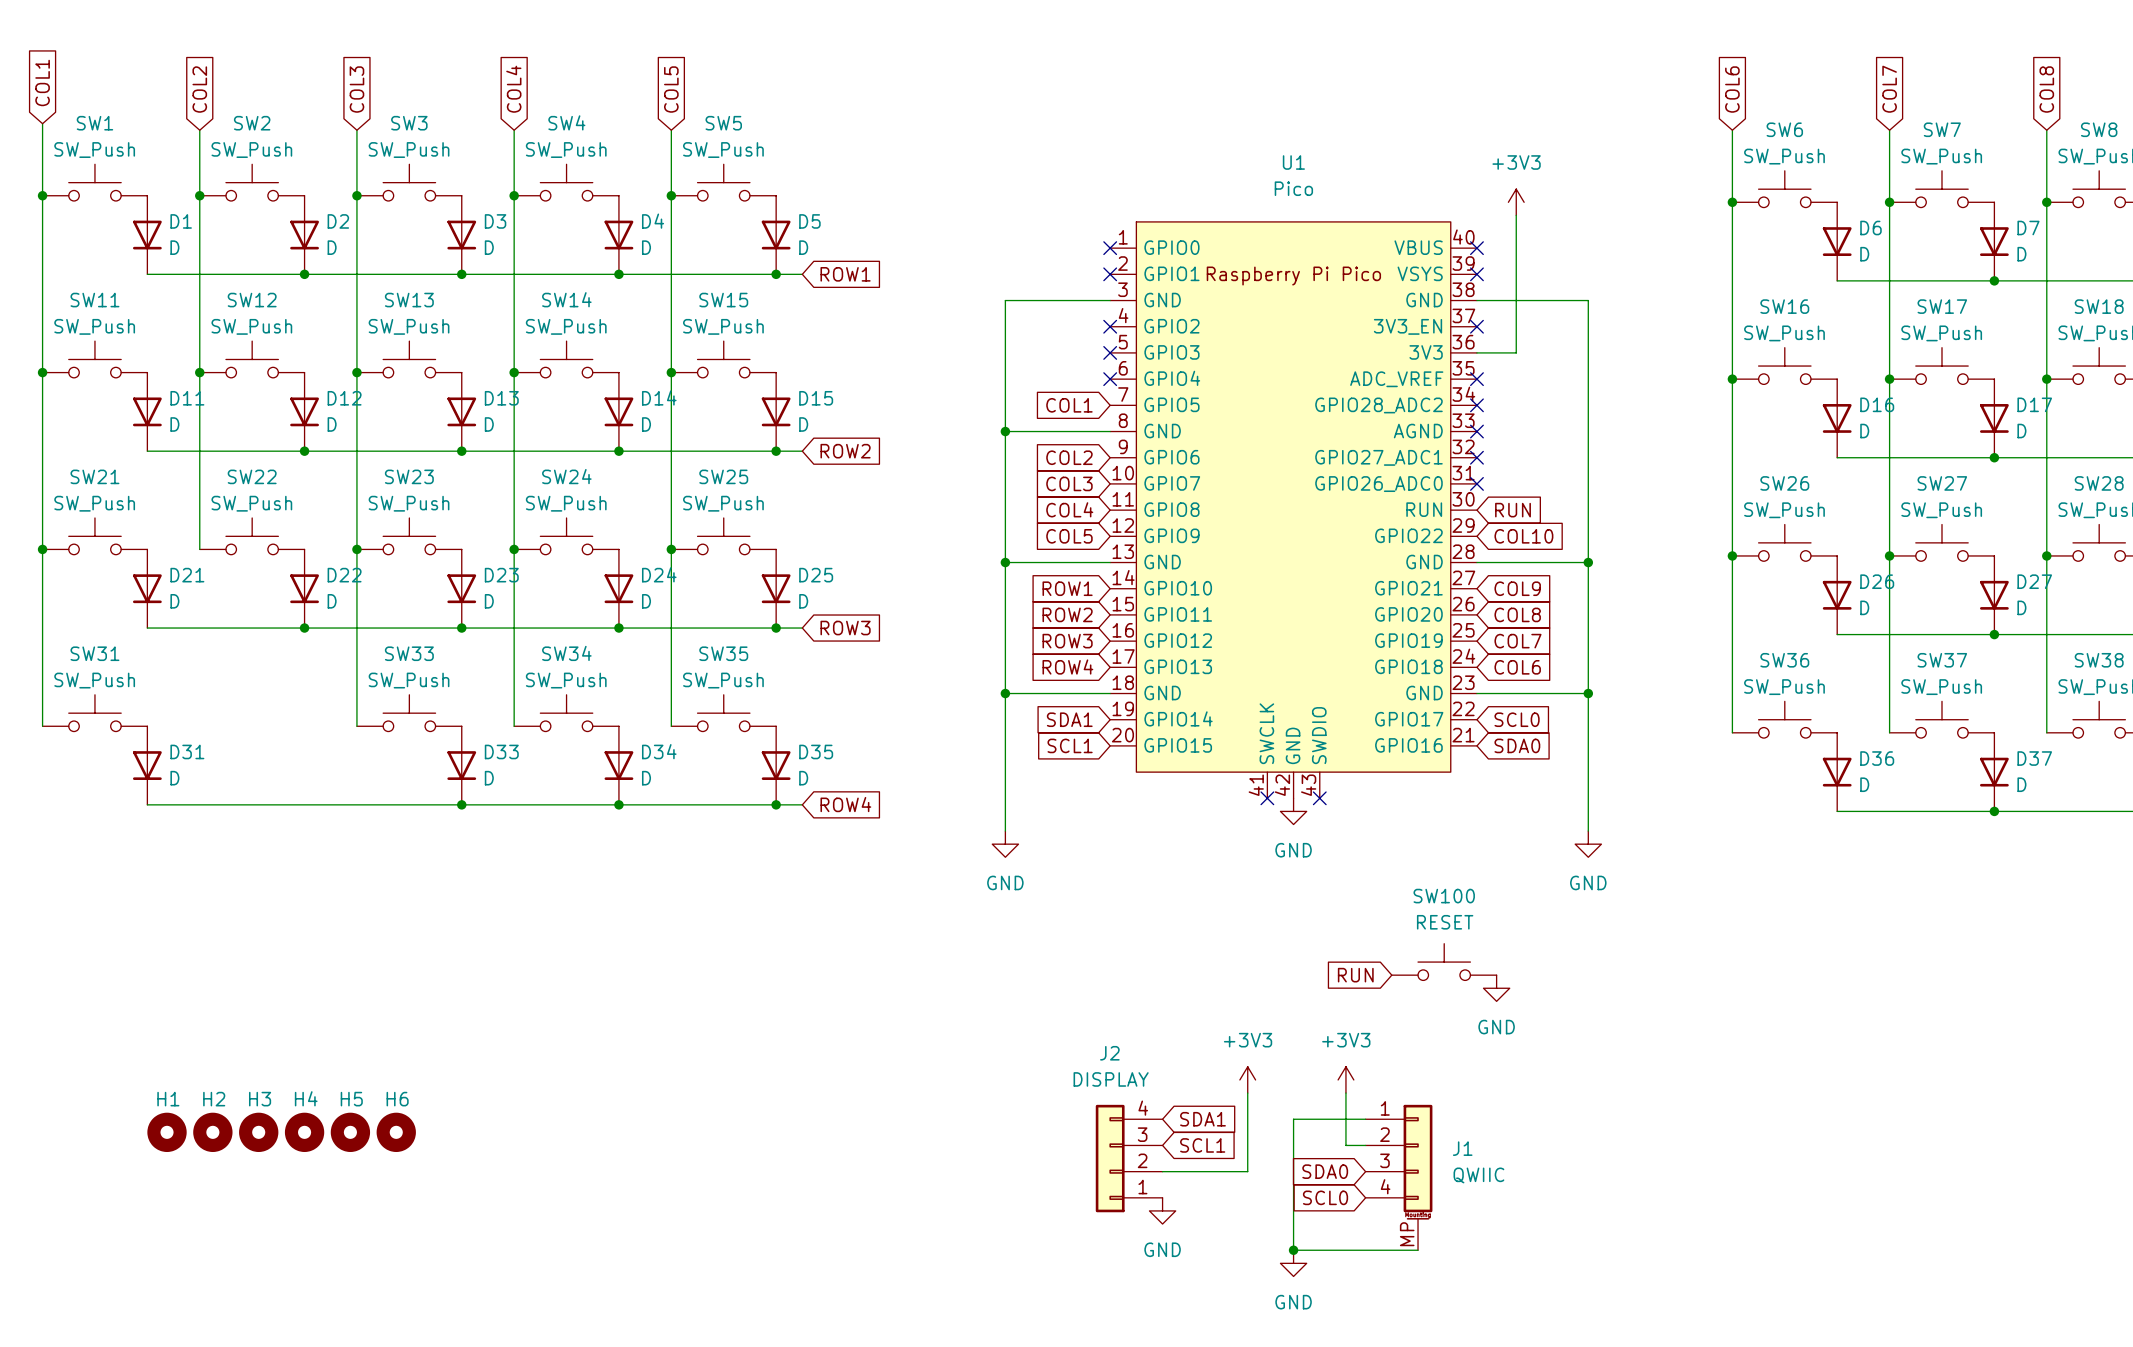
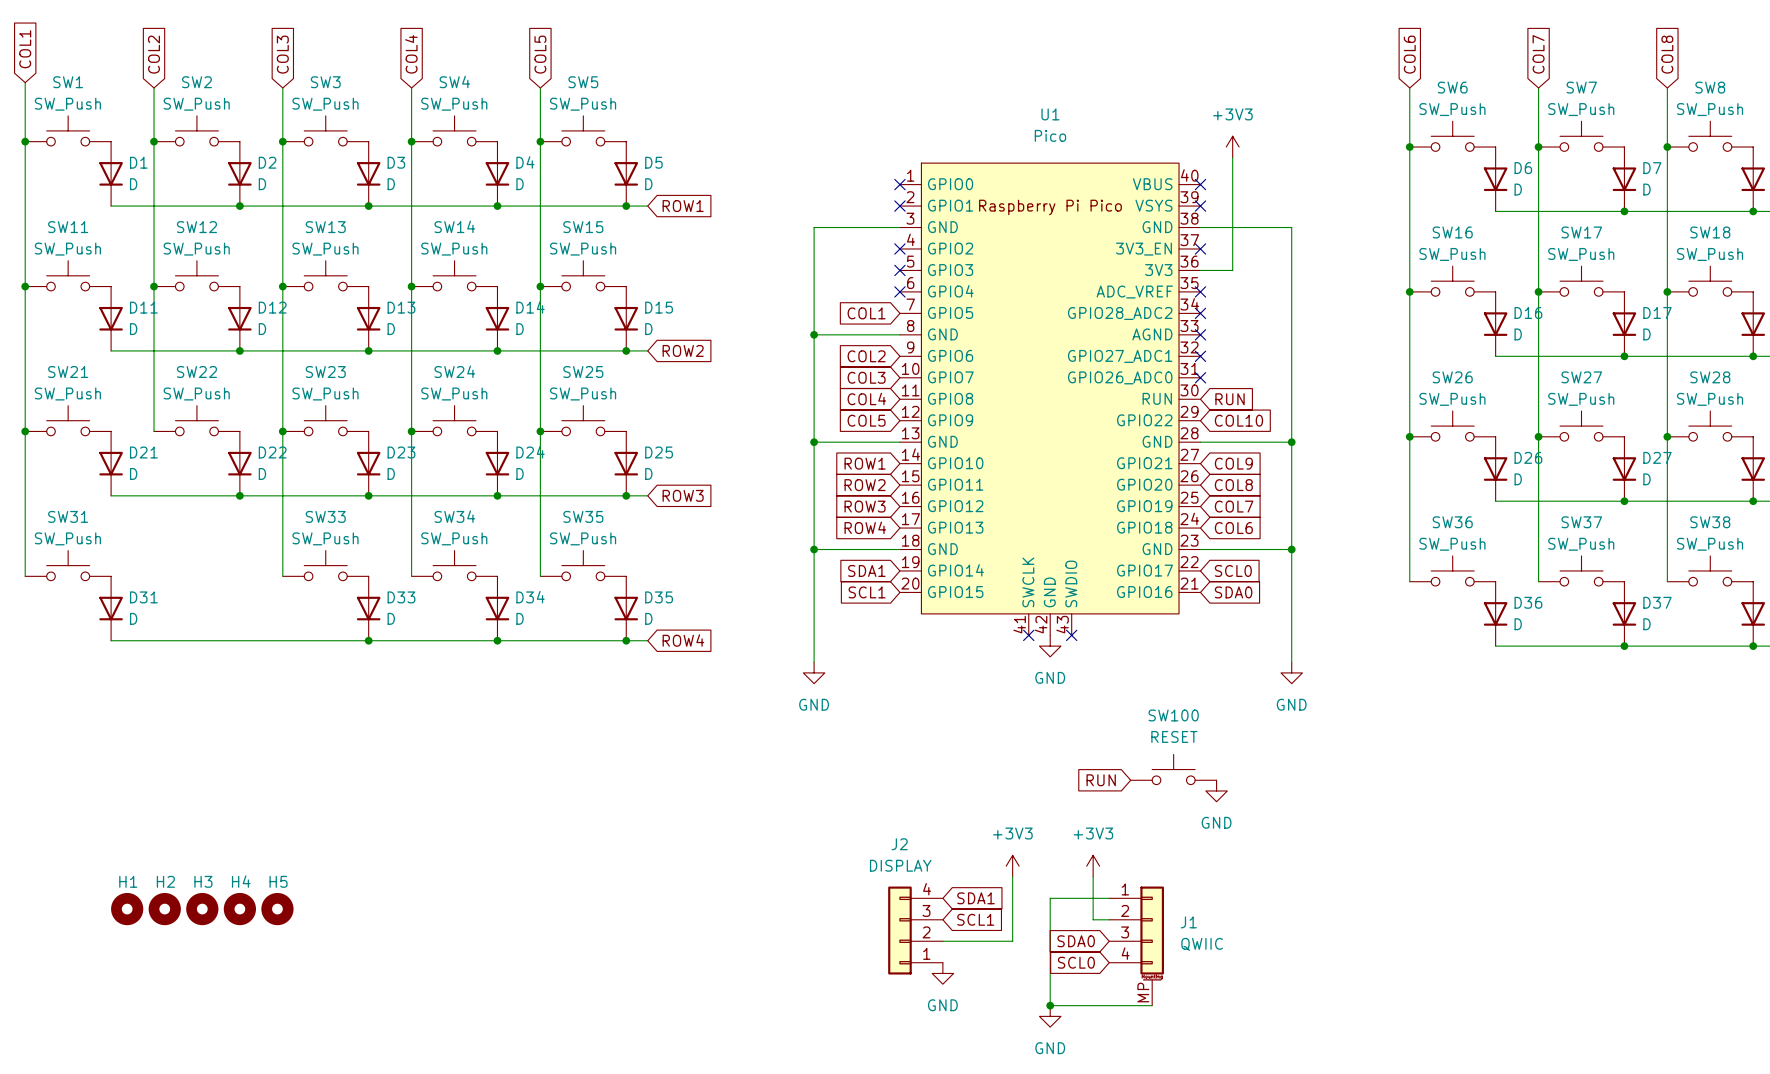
H6: (396, 1132) -> none

